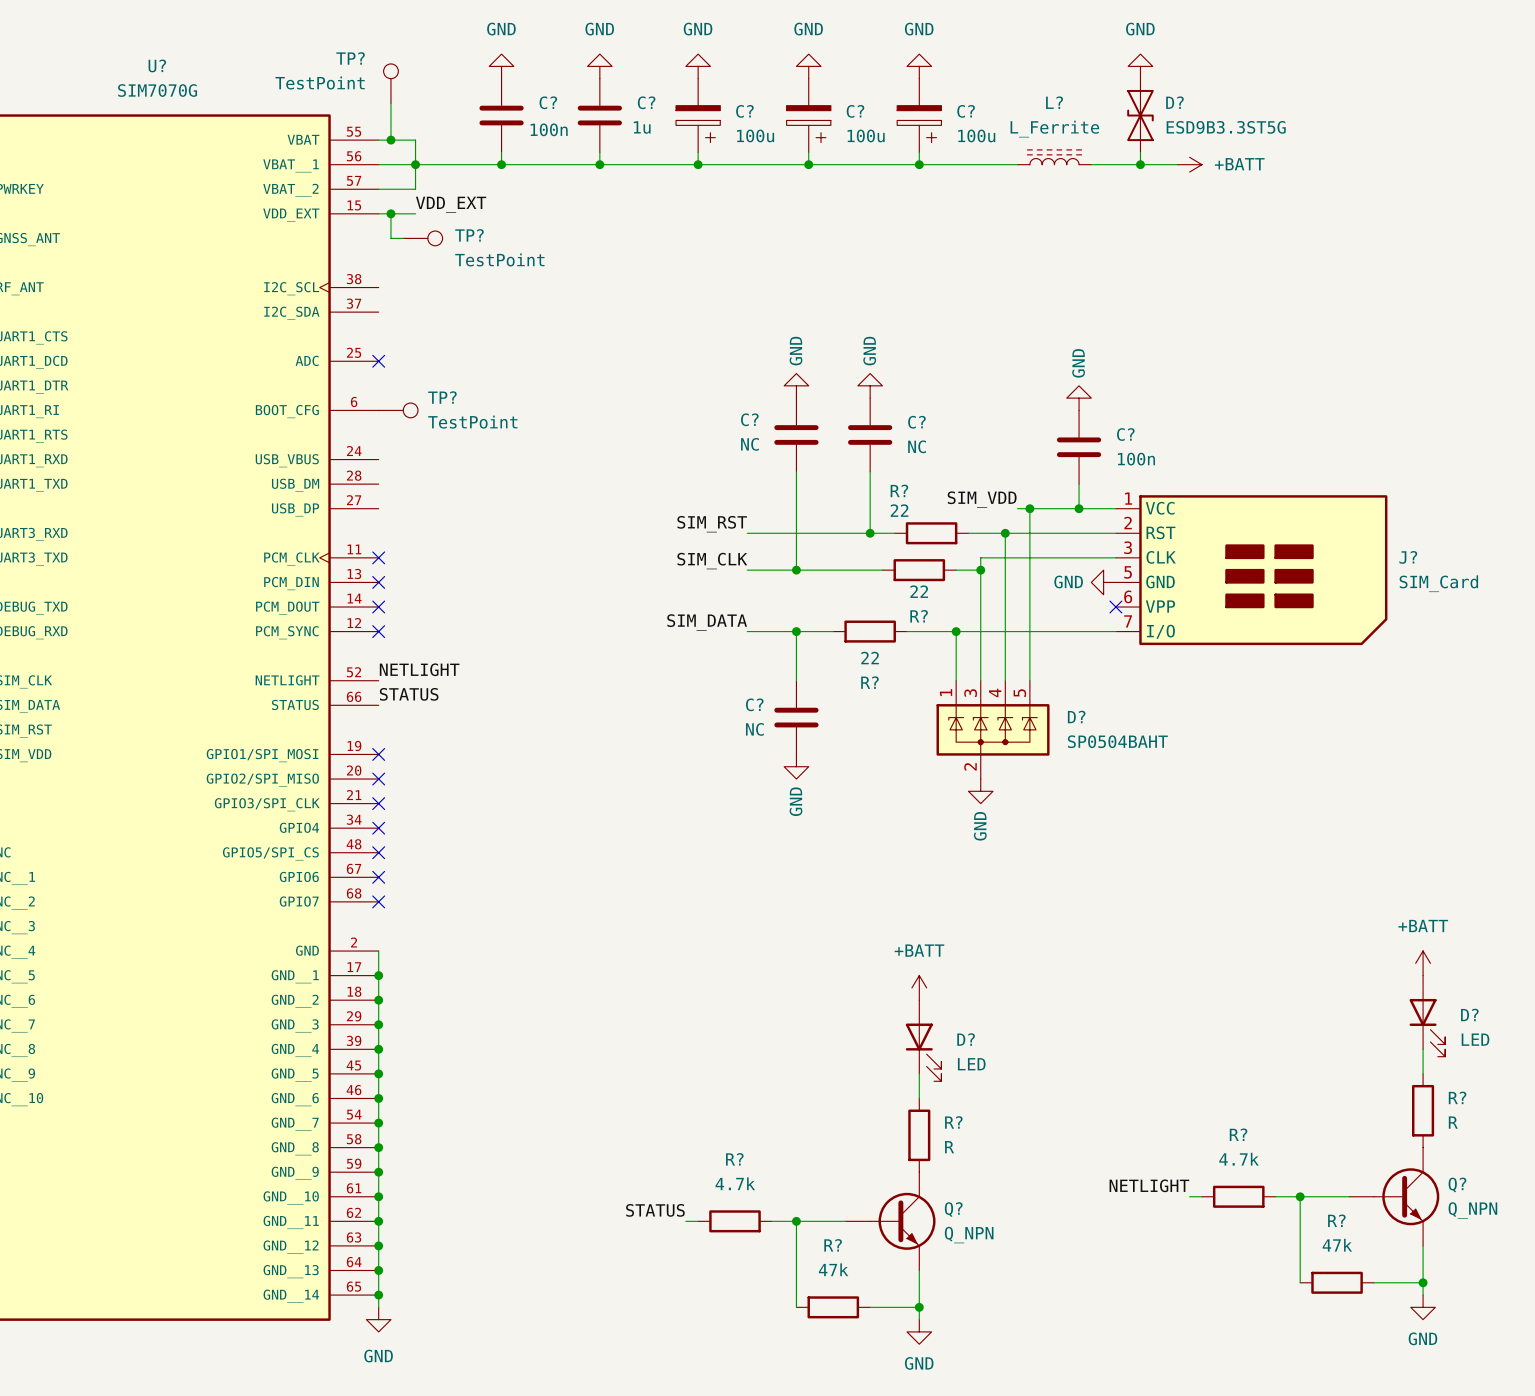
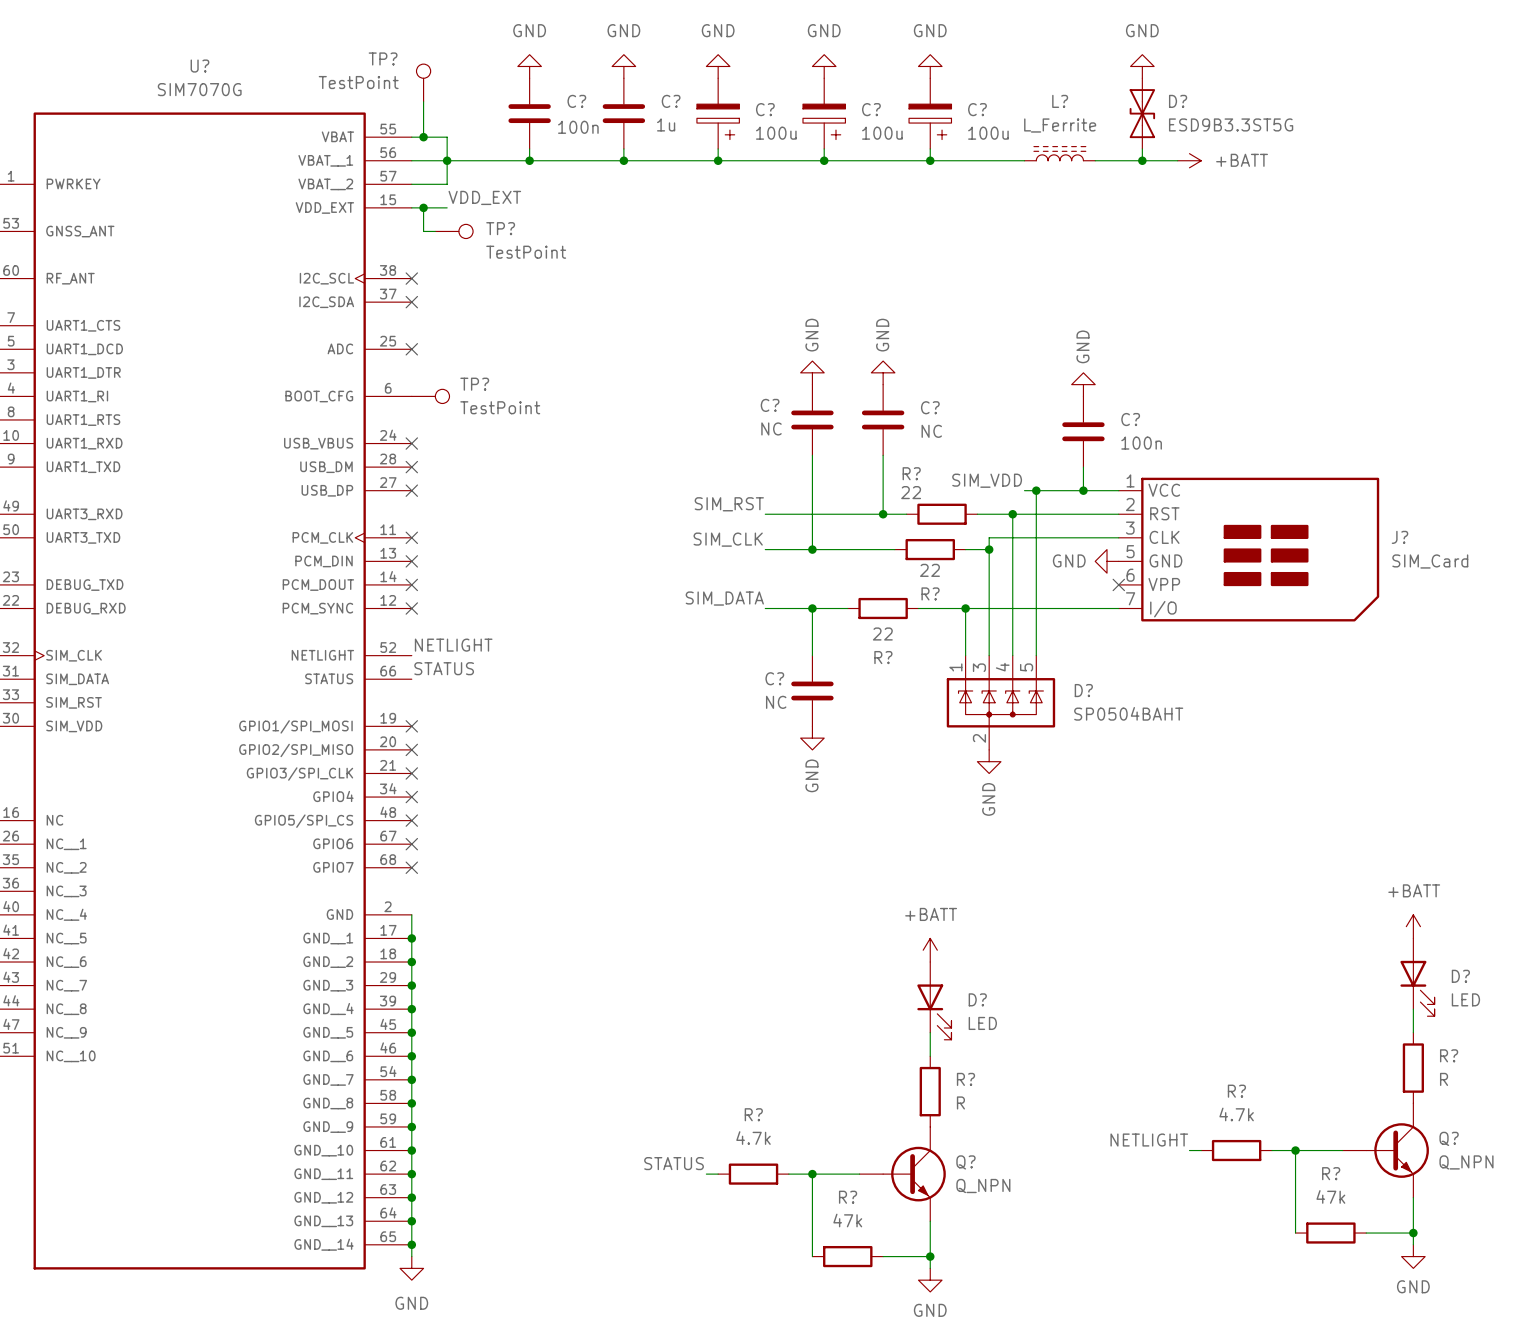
no-connect mark: none -> (411, 278)
no-connect mark: none -> (411, 302)
no-connect mark: none -> (411, 443)
no-connect mark: none -> (411, 467)
no-connect mark: none -> (411, 490)

